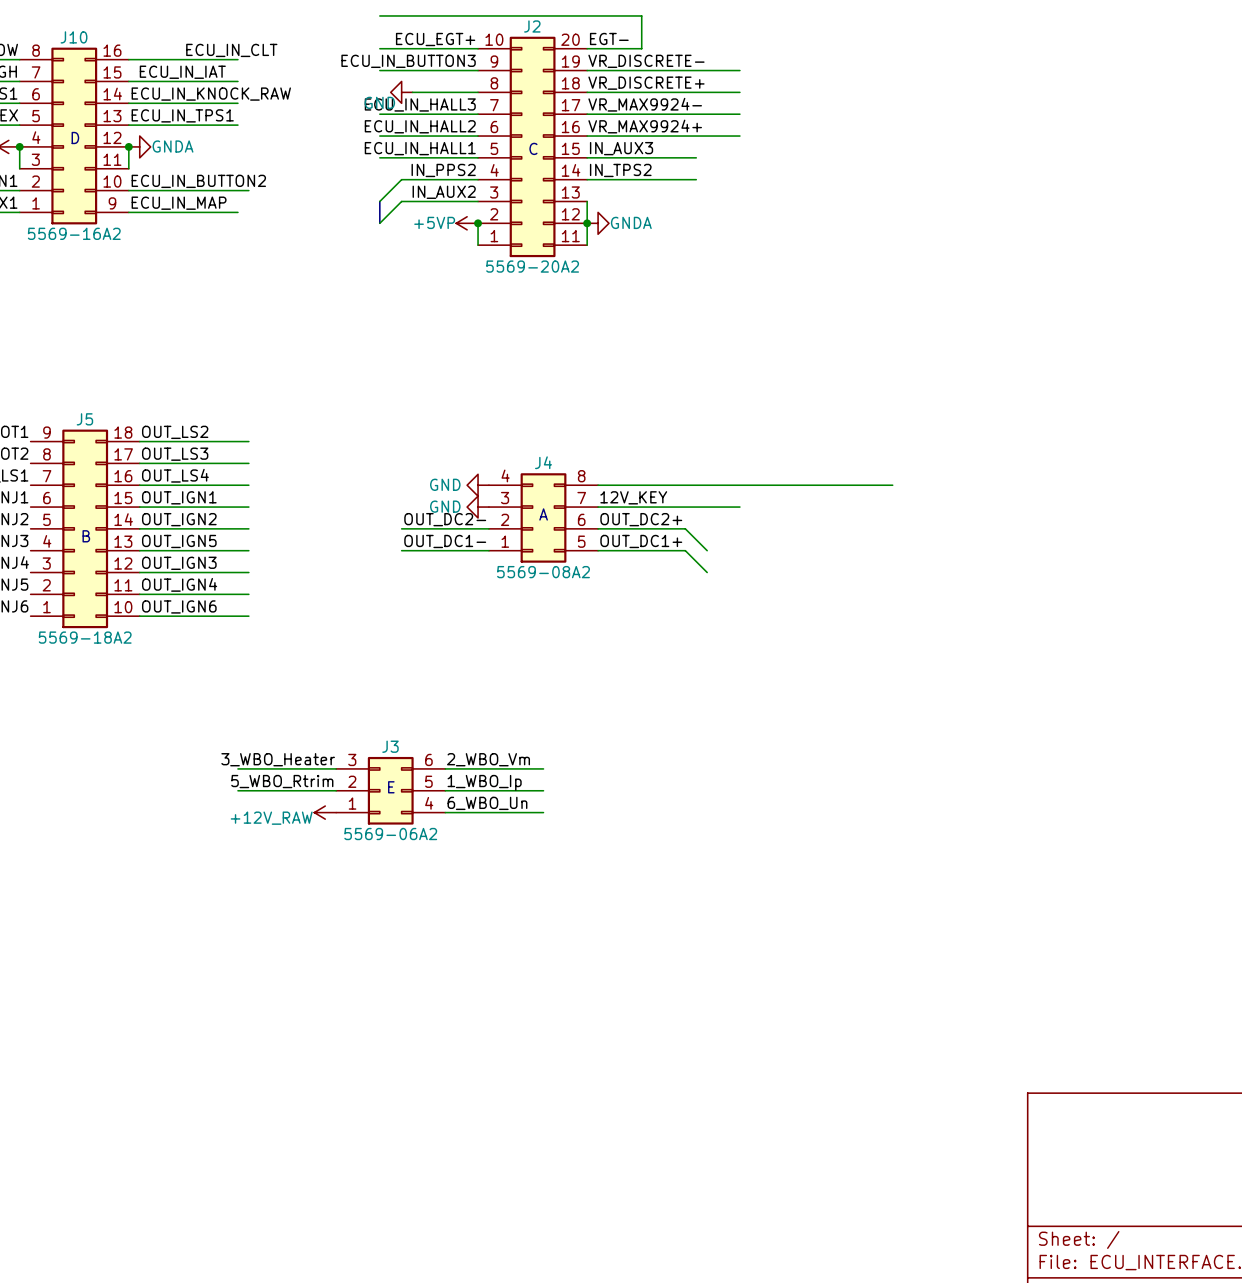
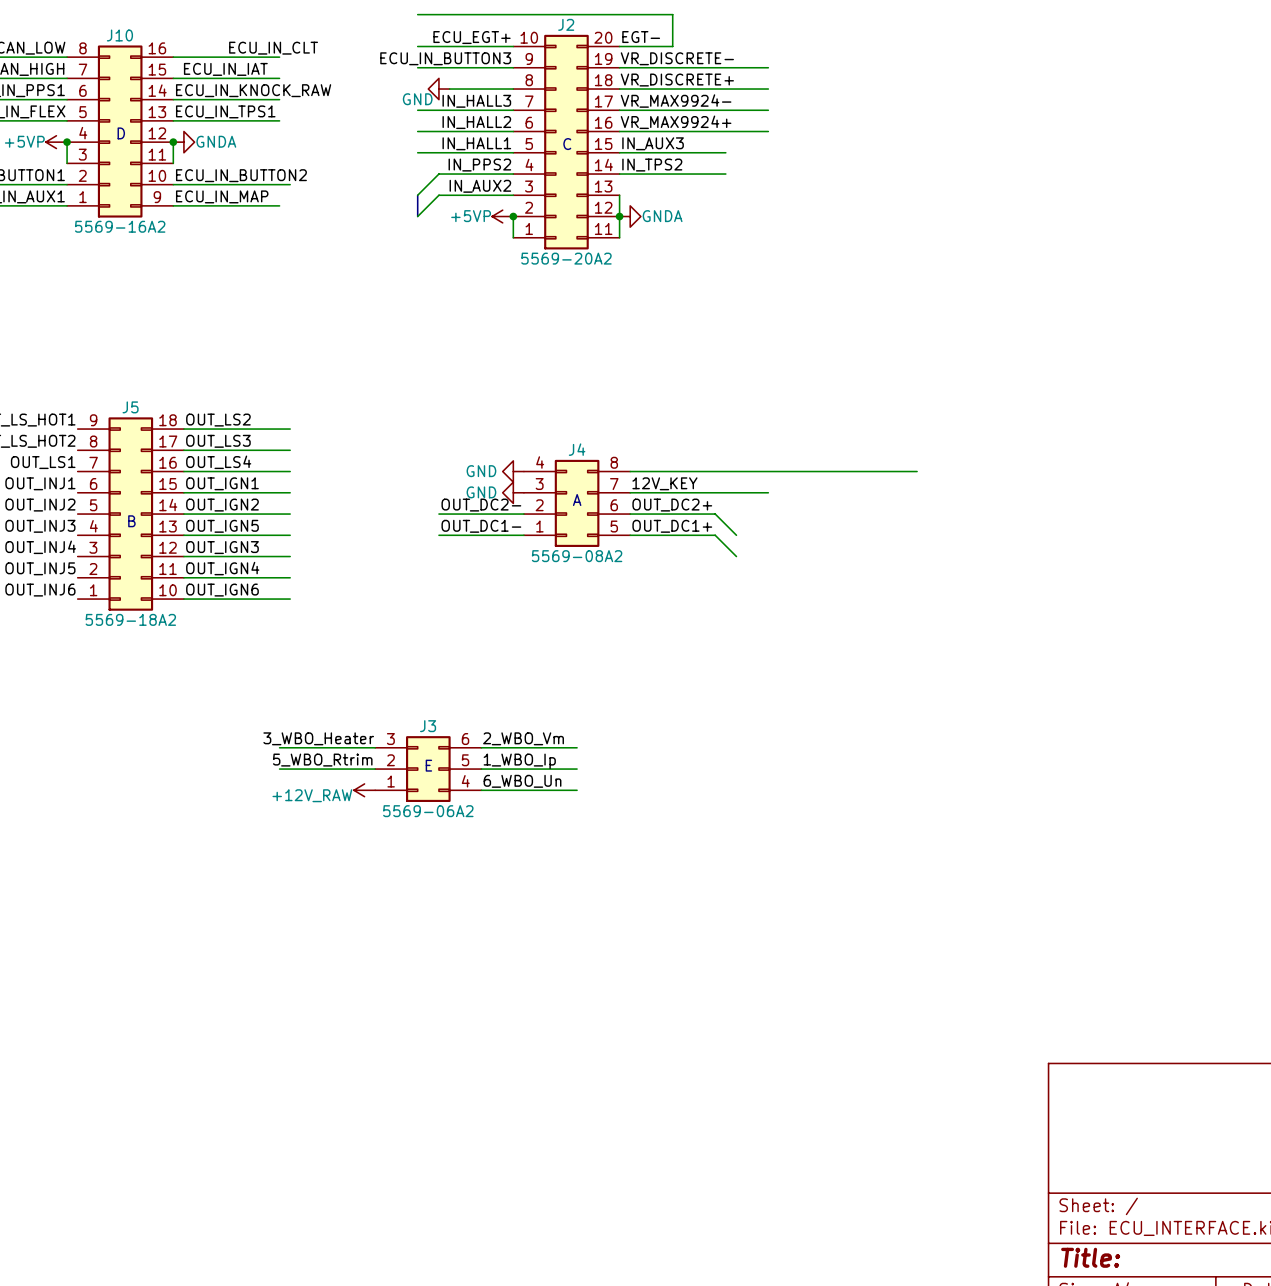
label: ECU_IN_HALL3 (420, 104) -> IN_HALL3 (476, 101)
label: ECU_IN_HALL2 (420, 126) -> IN_HALL2 (476, 122)
label: ECU_IN_HALL1 (420, 148) -> IN_HALL1 (476, 143)

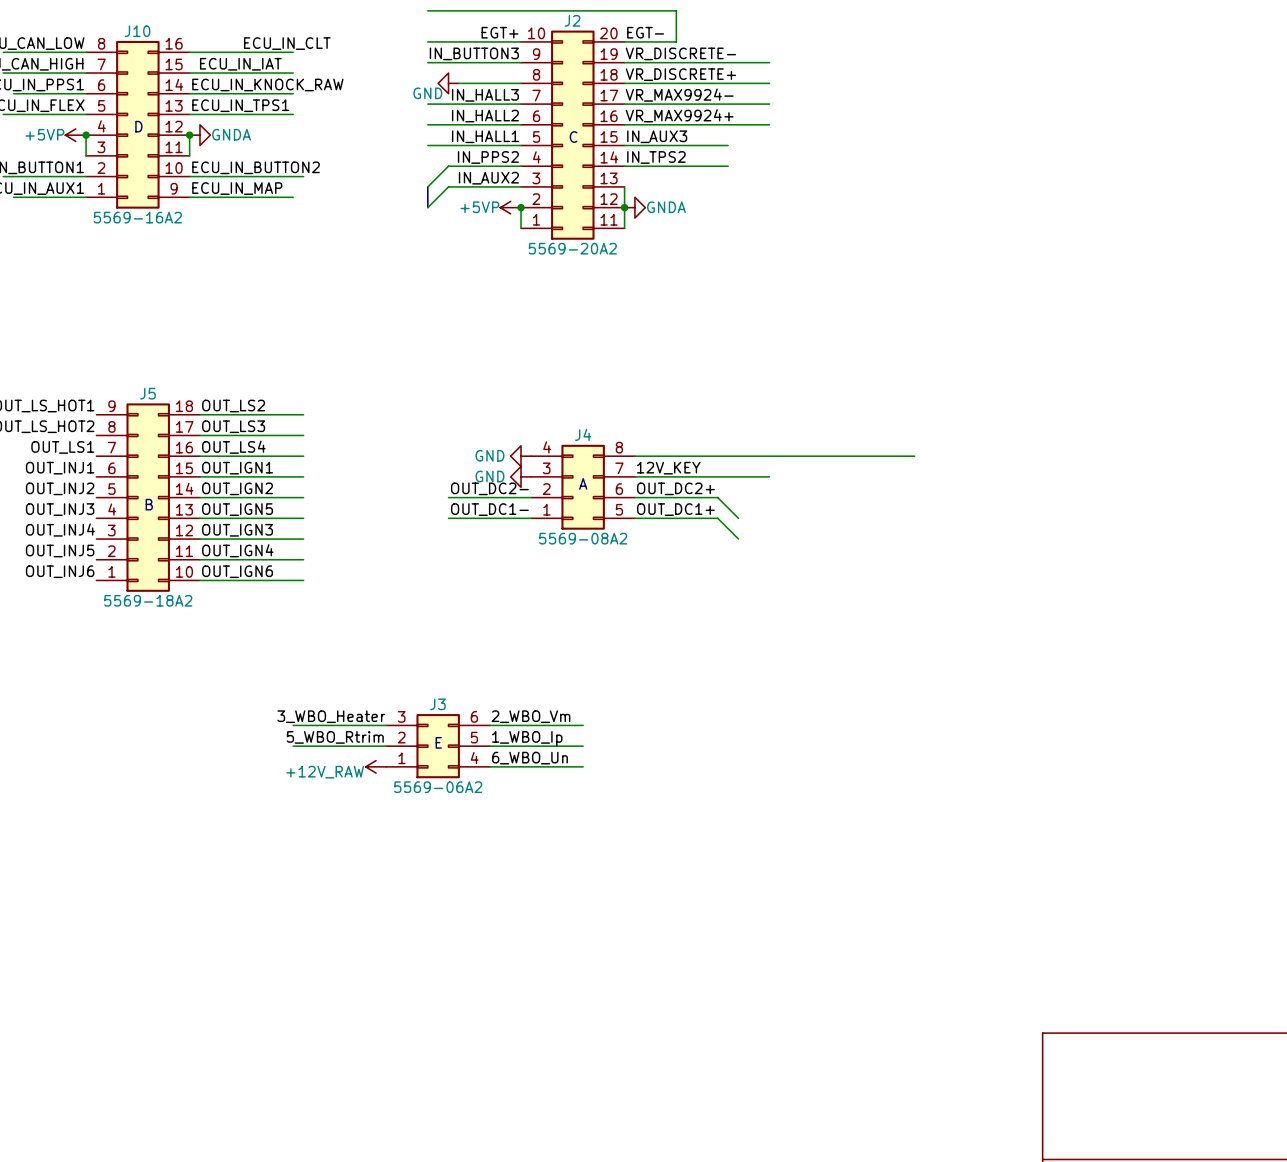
label: ECU_EGT+ (472, 37) -> EGT+ (499, 32)
label: ECU_IN_BUTTON3 (445, 58) -> IN_BUTTON3 (474, 53)

